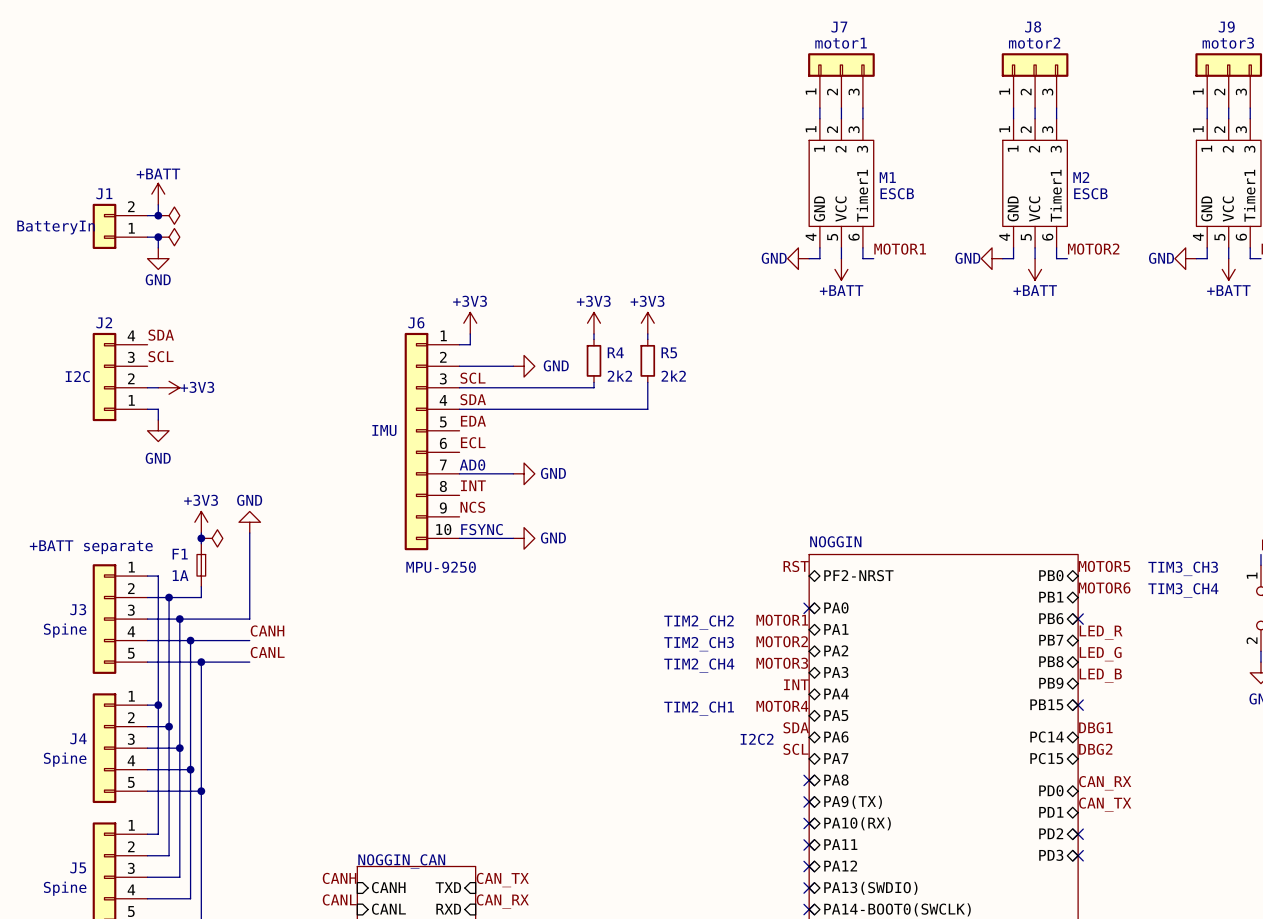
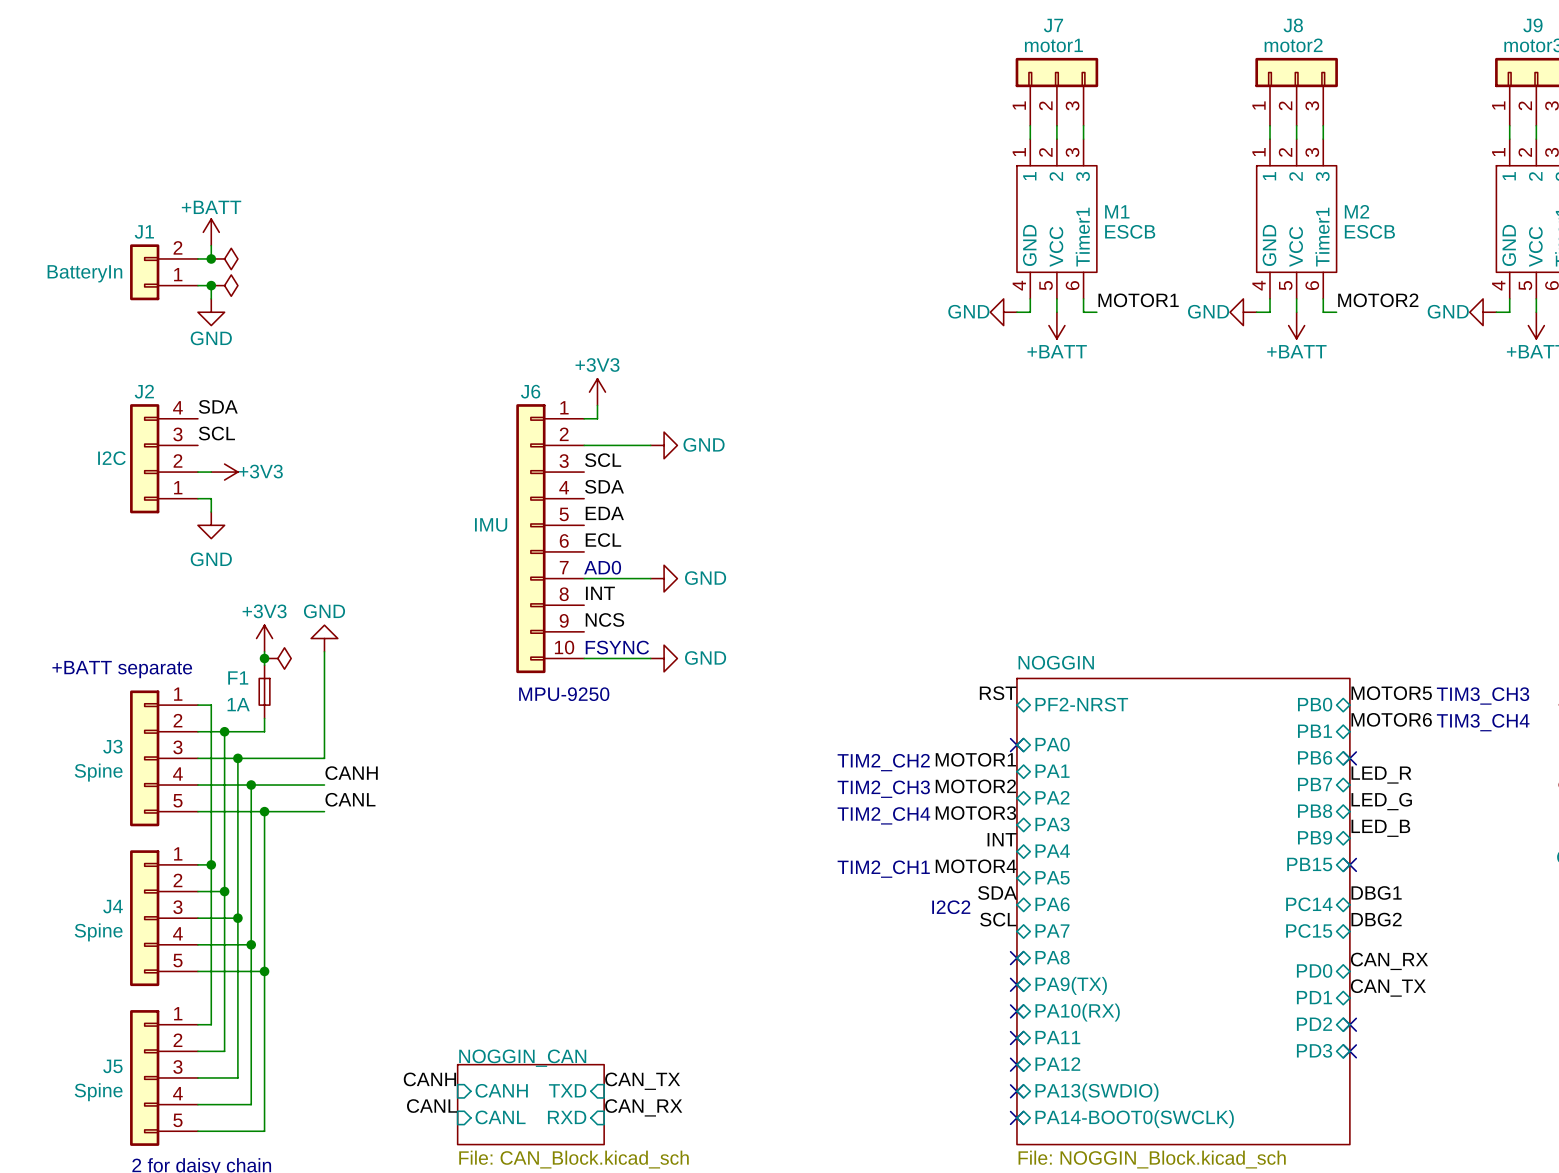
power symbol: +3V3 (593, 323) -> none
power symbol: +3V3 (647, 323) -> none
wire: (593, 333) (593, 339) -> none
wire: (647, 333) (647, 339) -> none
R4: 2k2 (593, 360) -> none
R5: 2k2 (647, 360) -> none
wire: (593, 382) (593, 387) (459, 387) -> none
wire: (647, 382) (647, 409) (459, 409) -> none

